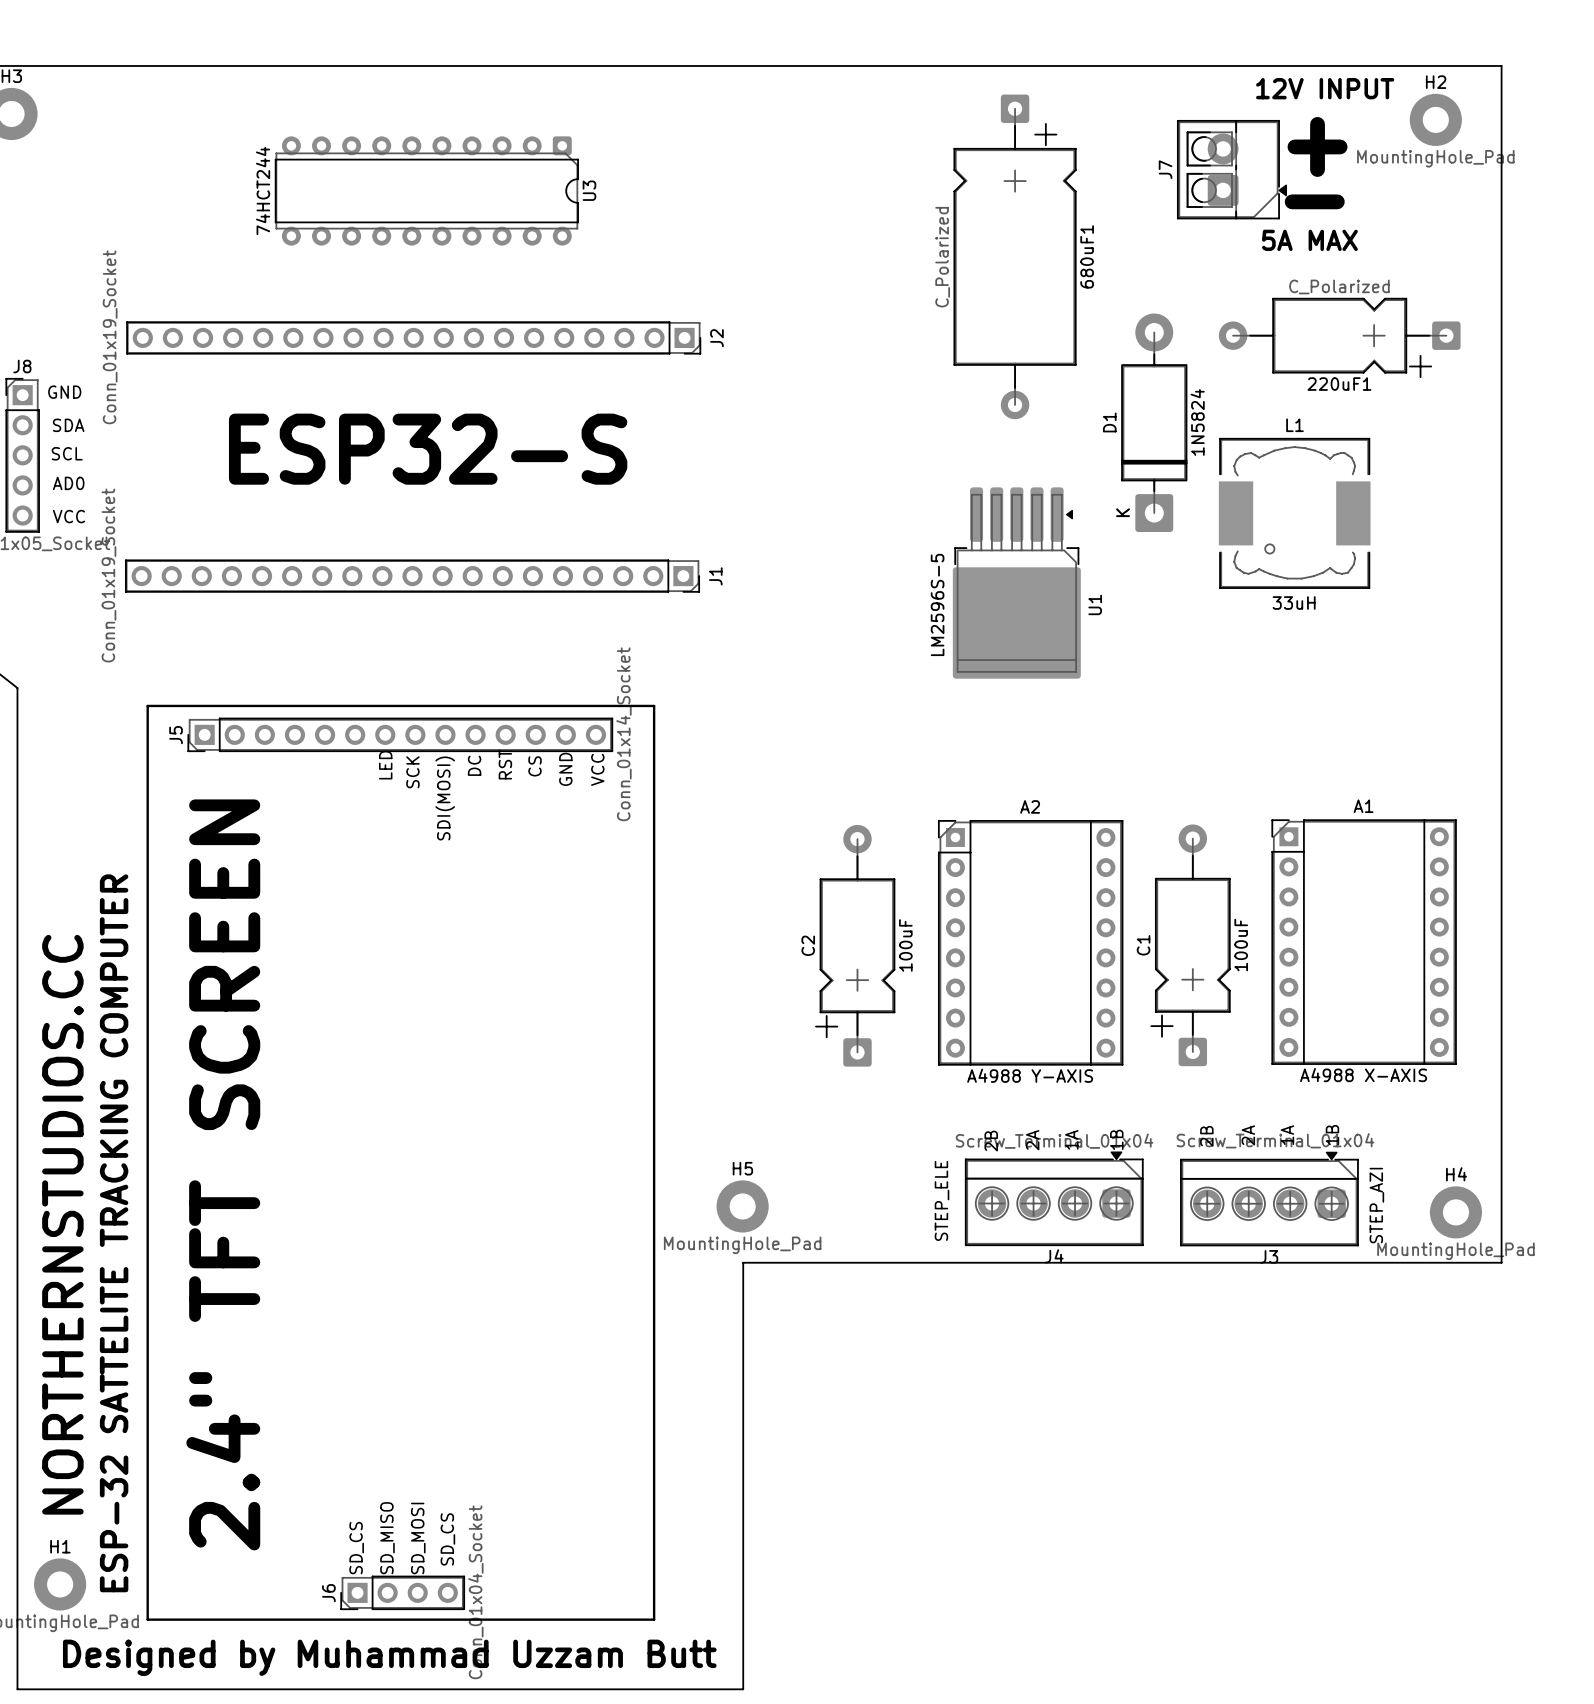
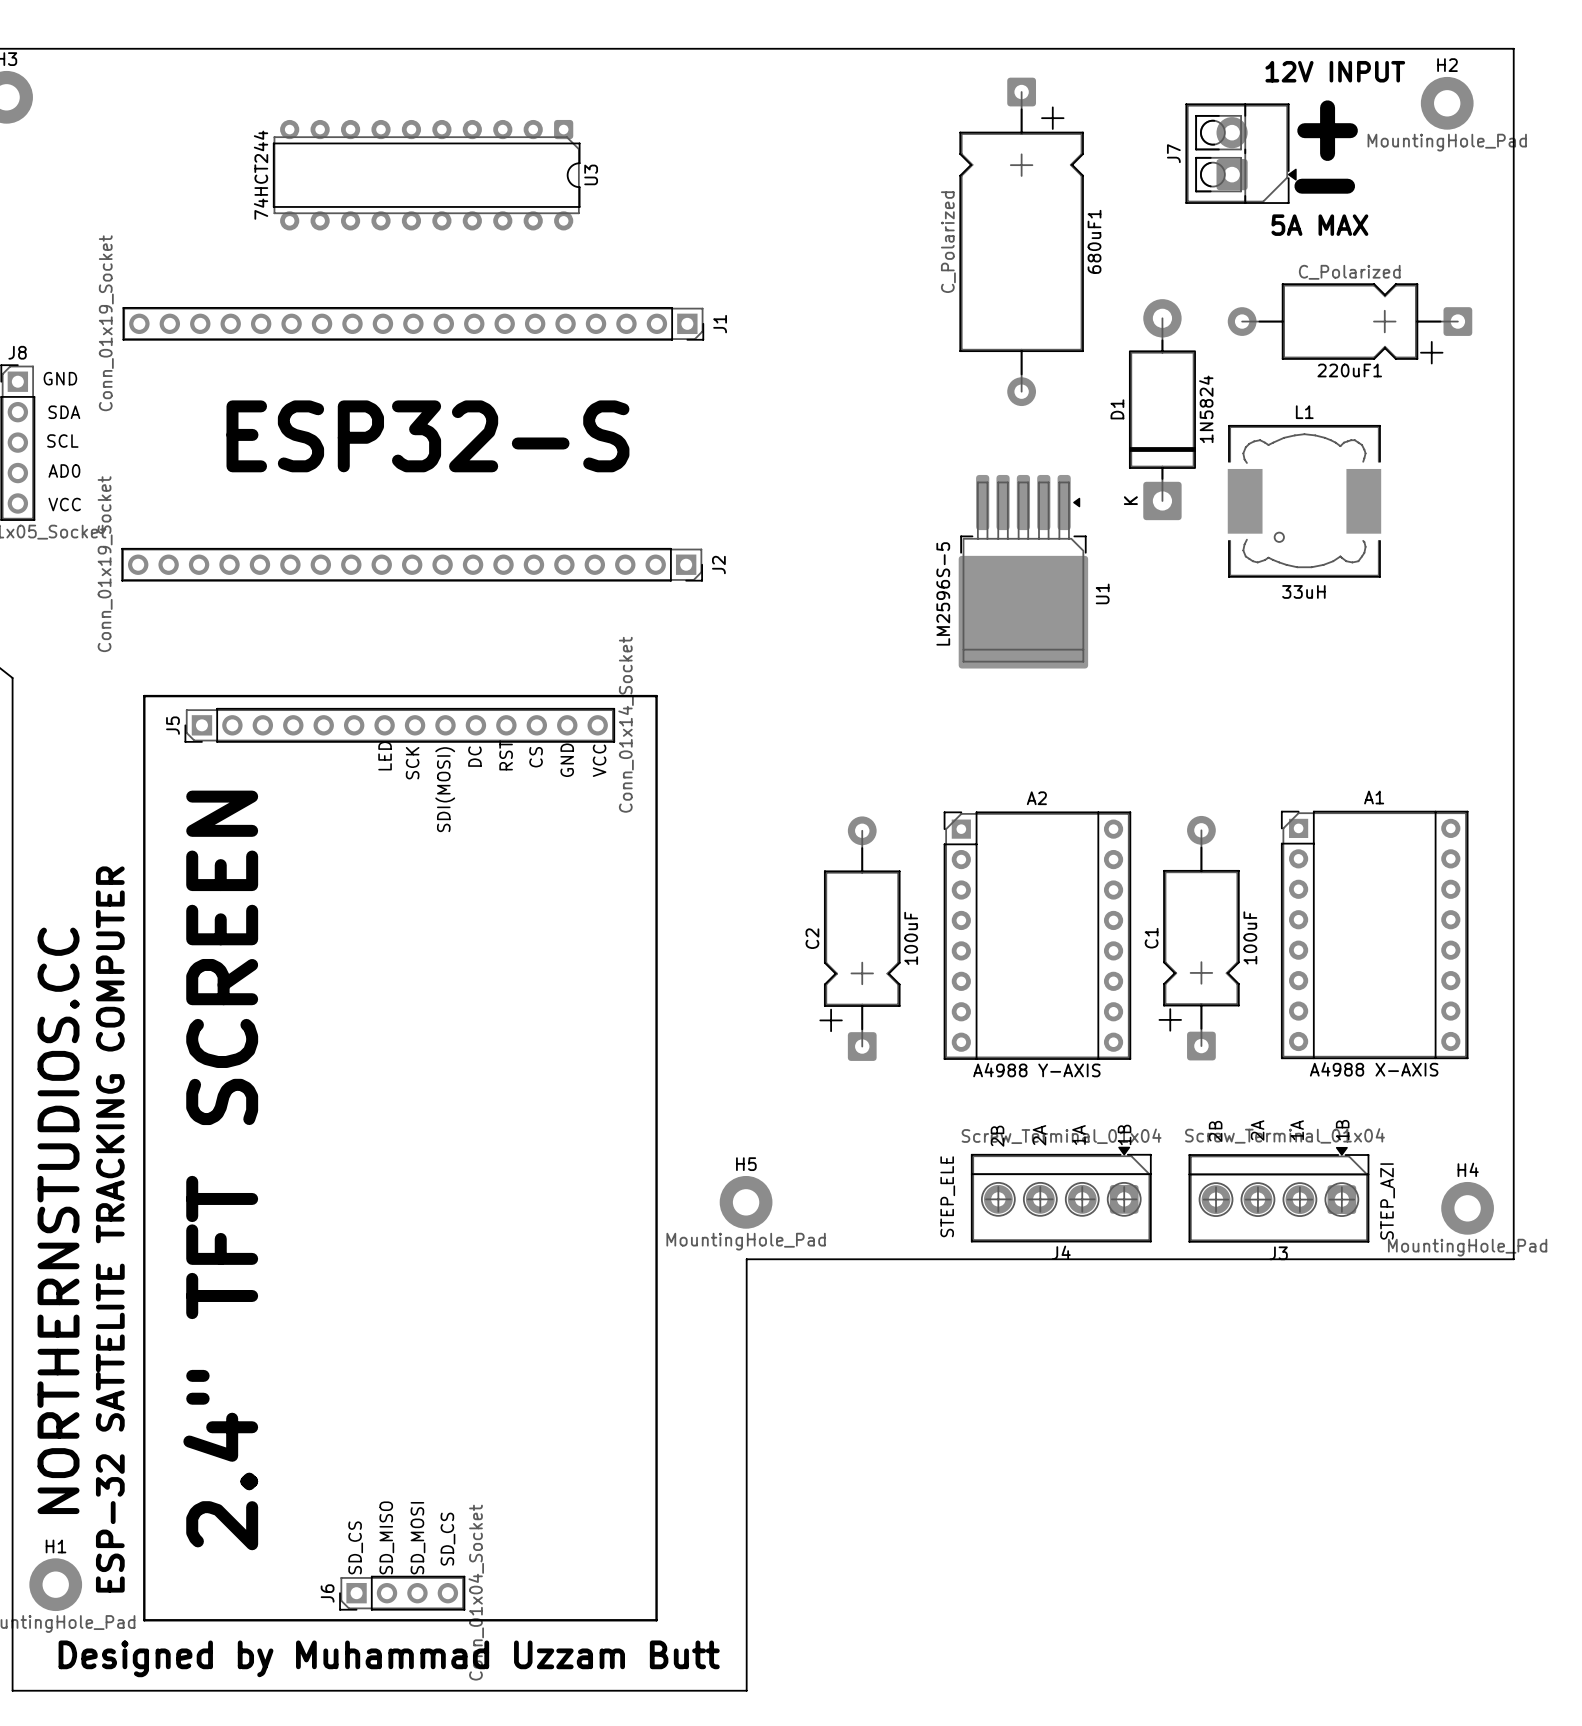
J2 name: J2 (716, 338) -> J1 (720, 324)
J1 name: J1 (715, 576) -> J2 (718, 565)

